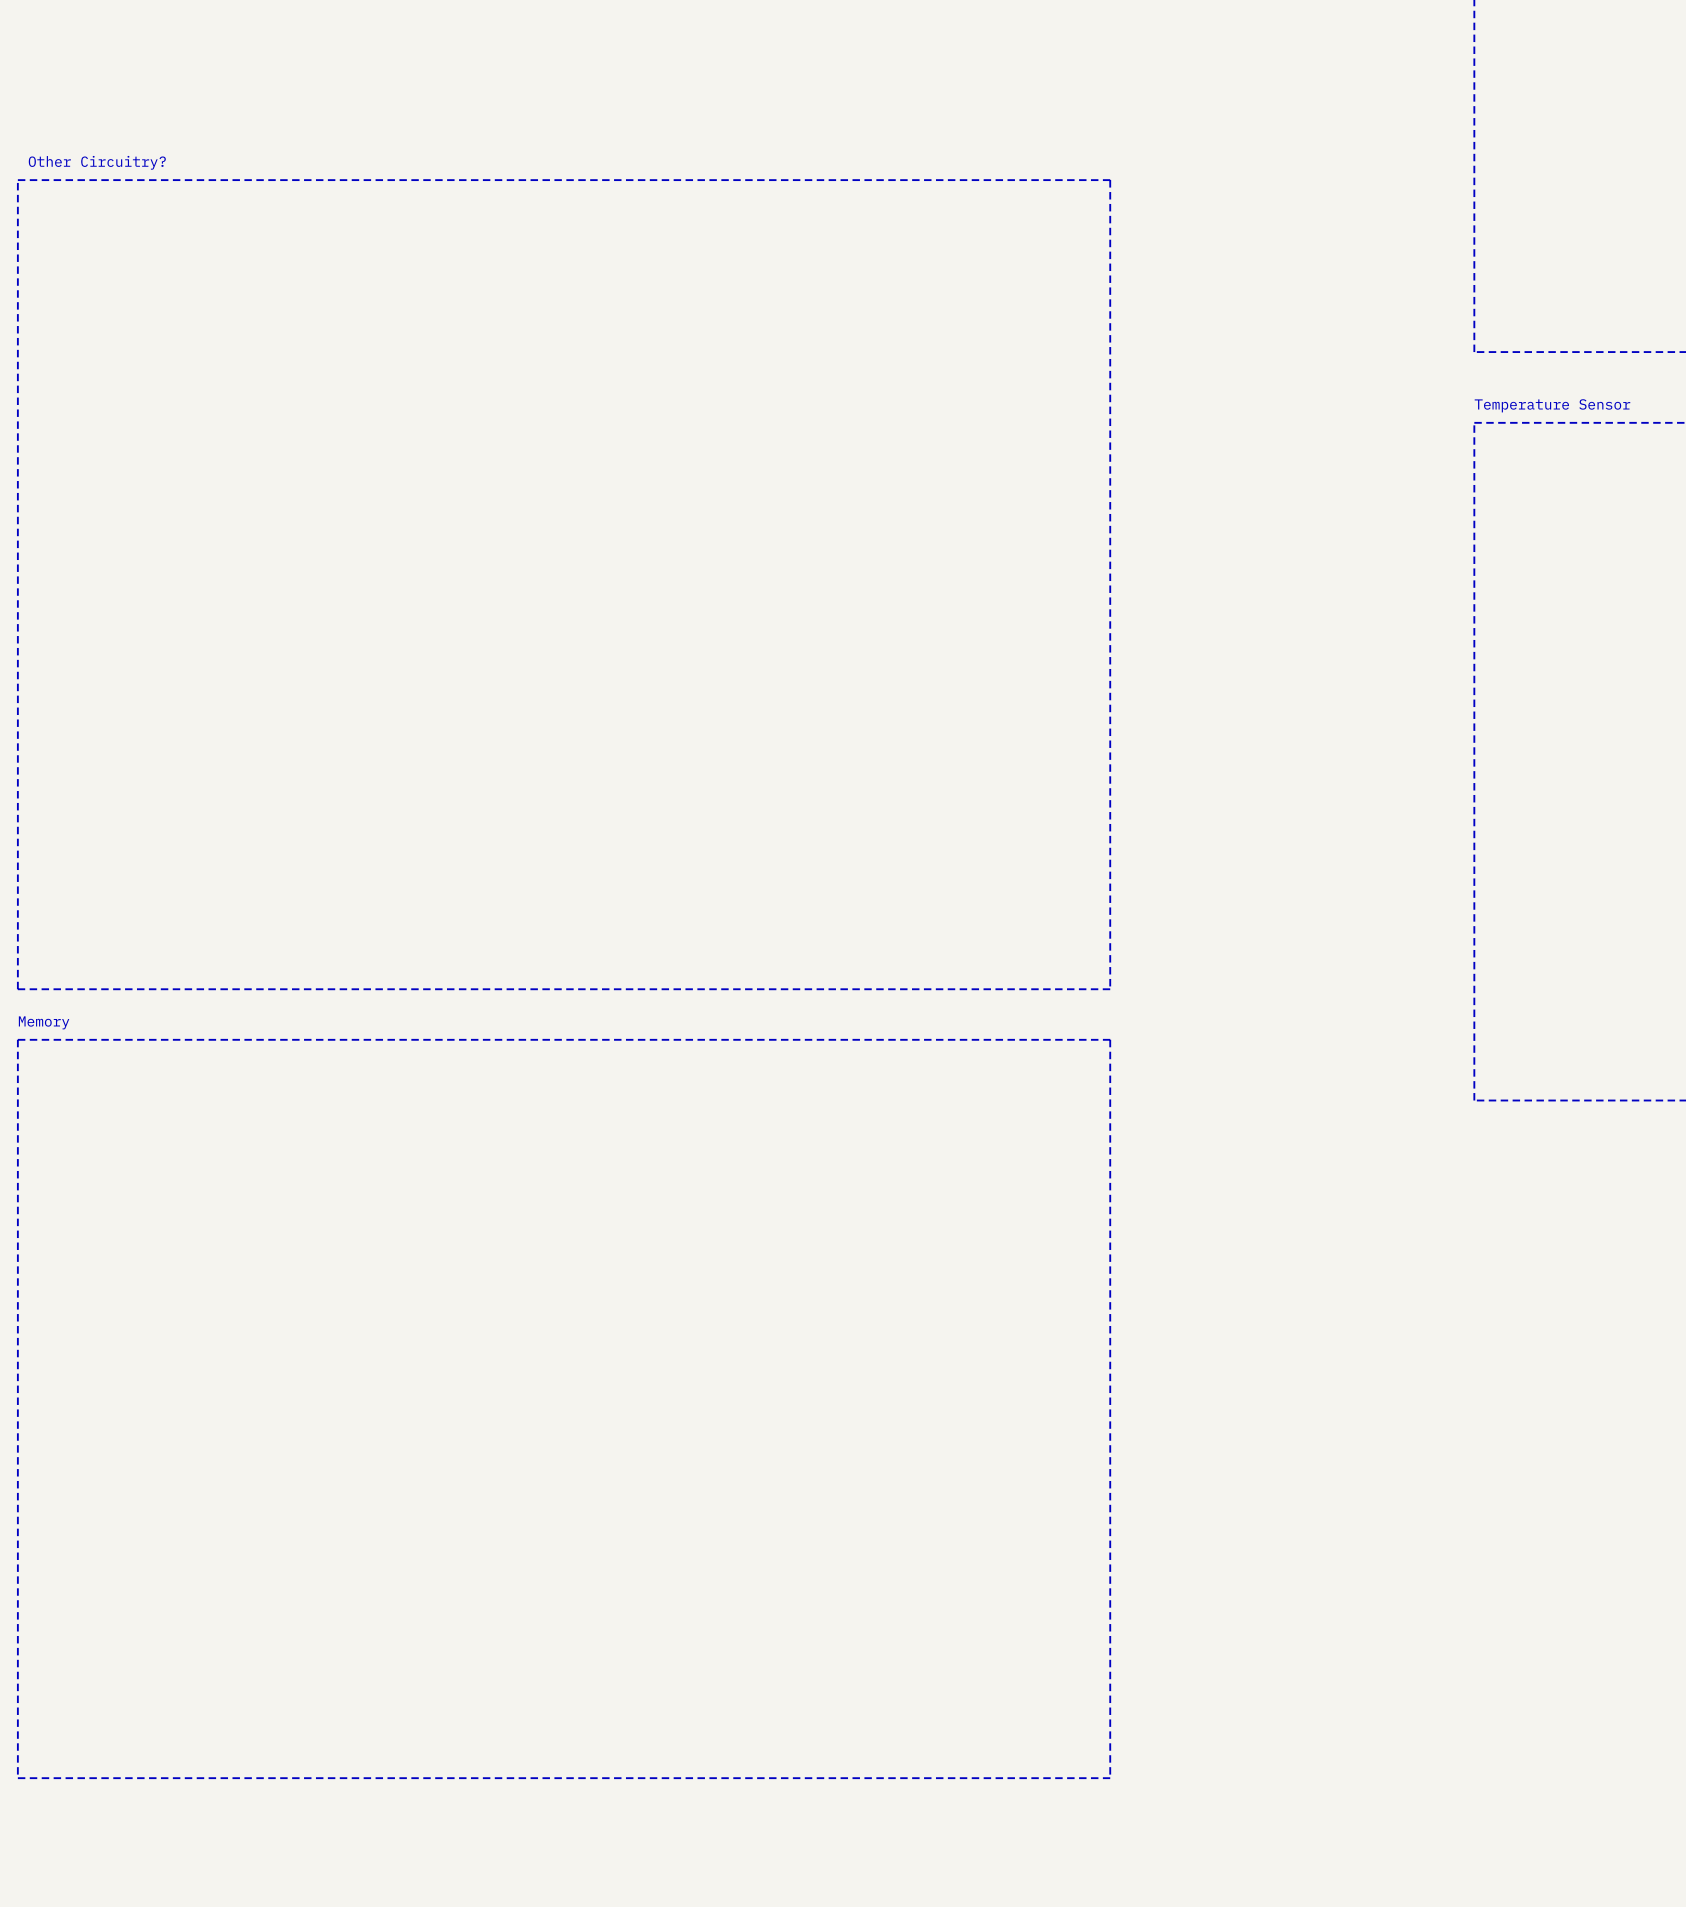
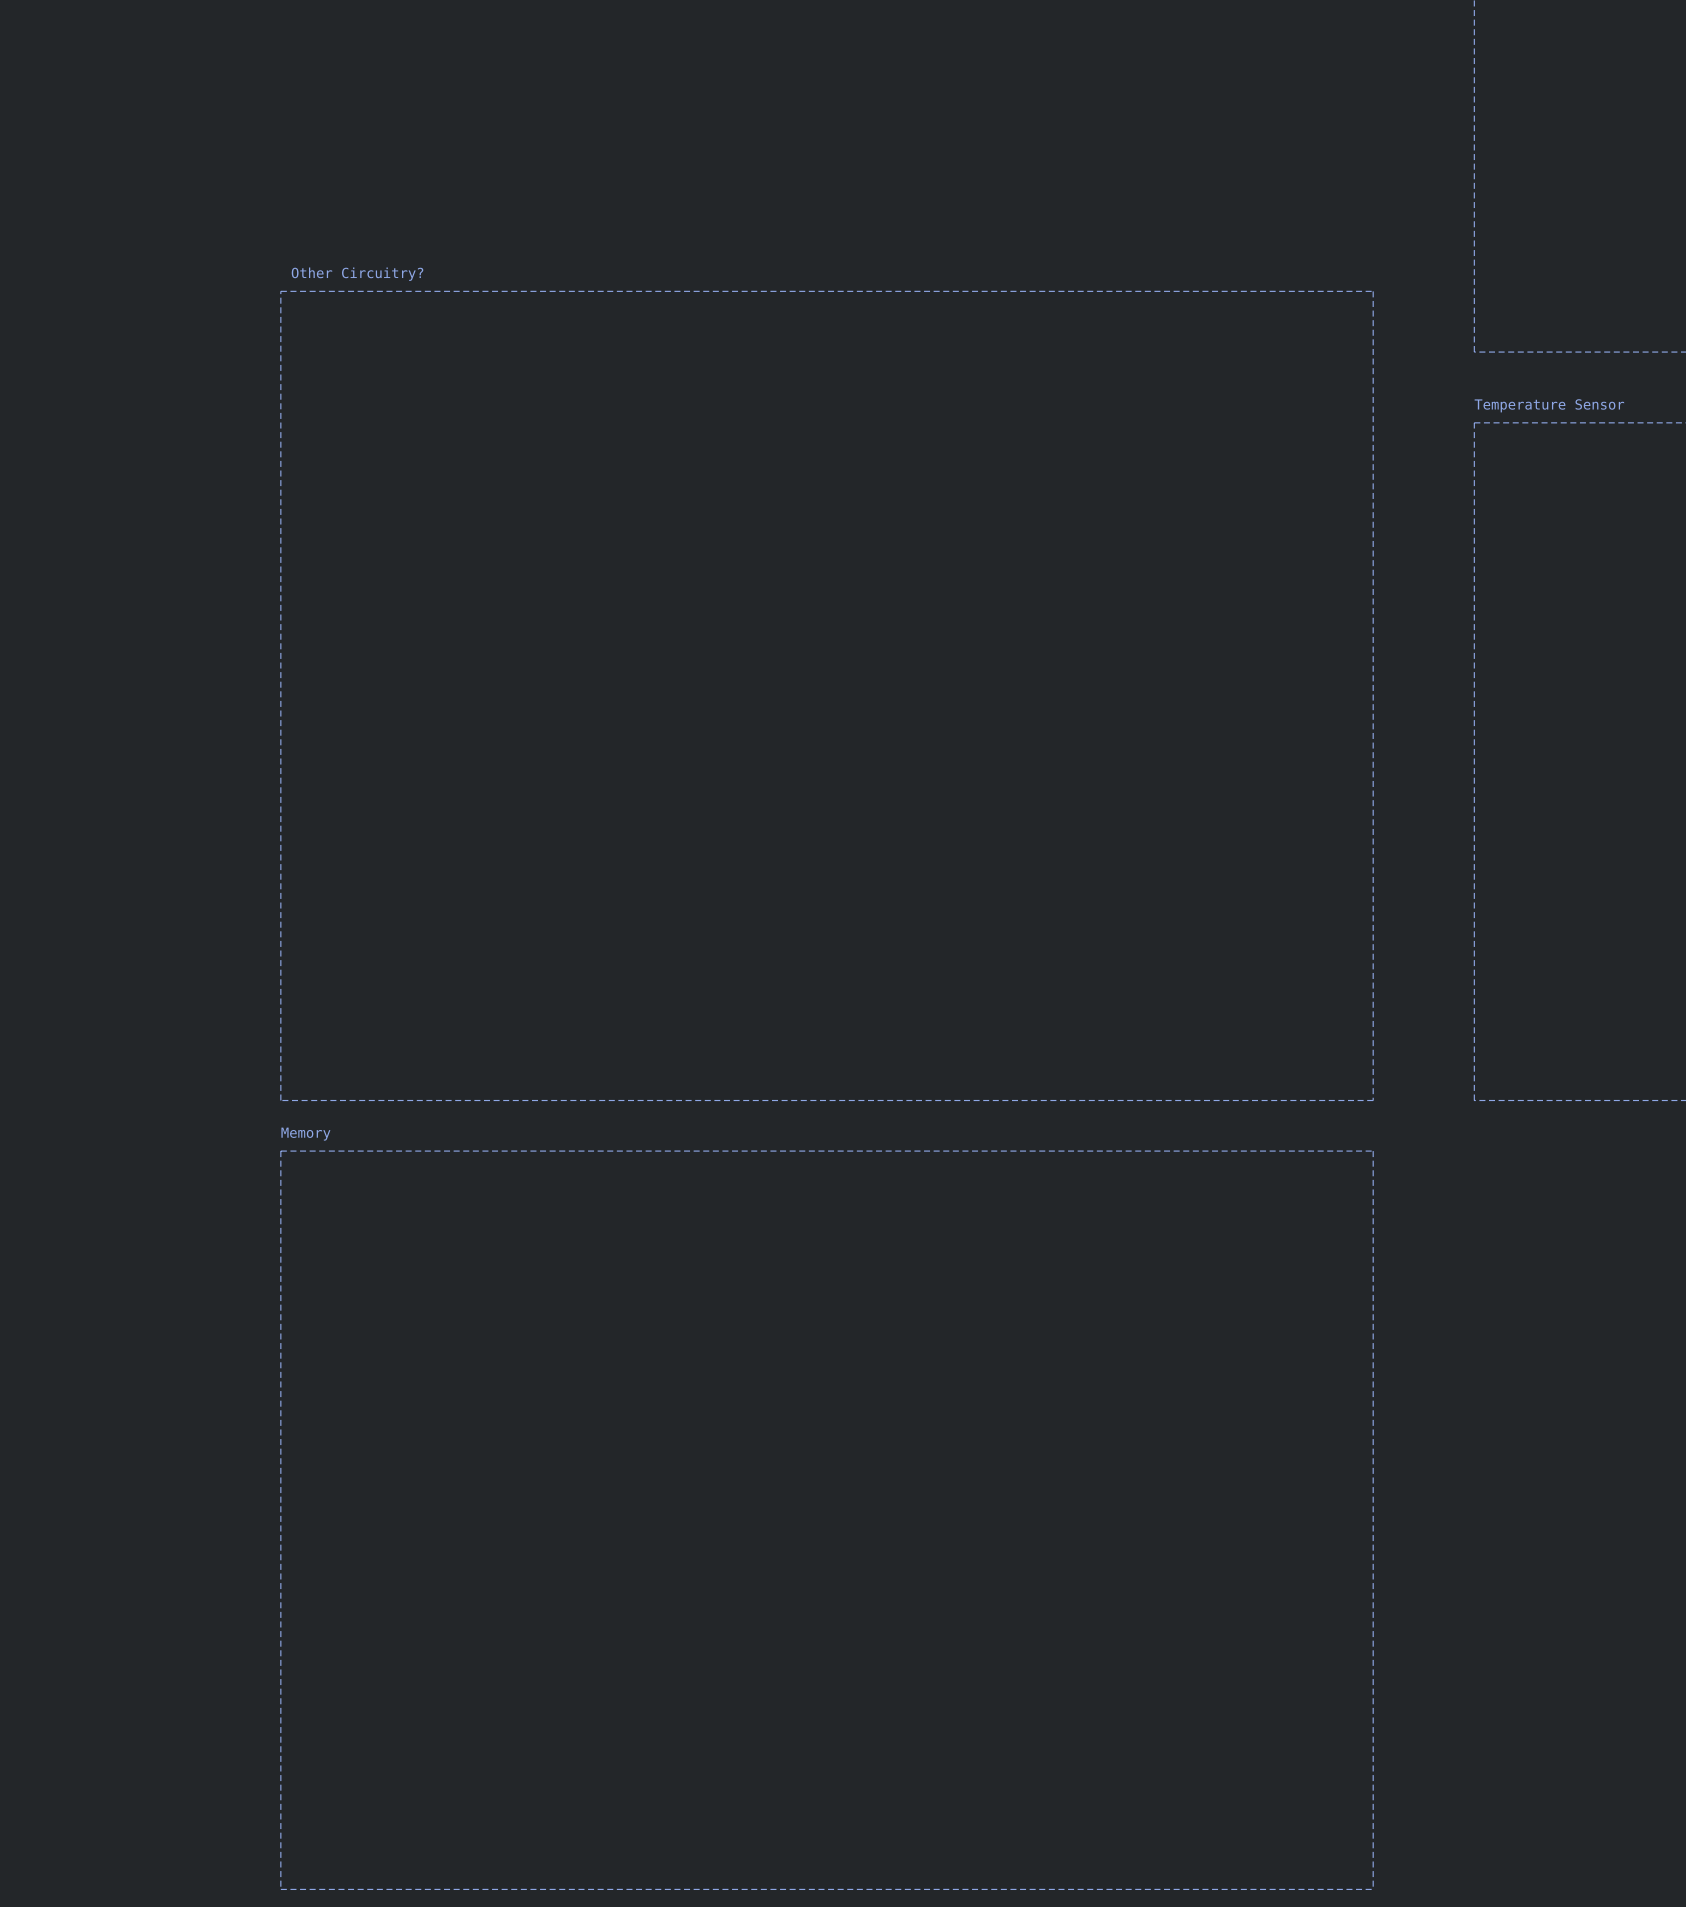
text: Other Circuitry? (97, 162) -> none
line: (17, 180) (17, 989) (1110, 989) (1110, 180) (17, 180) -> none
text: none -> Other Circuitry? (357, 274)
line: none -> (280, 291) (1373, 291) (1373, 1100) (280, 1100) (280, 291)
text: Memory (44, 1022) -> none
line: (17, 1039) (17, 1778) (1110, 1778) (1110, 1039) (17, 1039) -> none
text: none -> Memory (305, 1134)
line: none -> (280, 1151) (280, 1889) (1373, 1889) (1373, 1151) (280, 1151)

